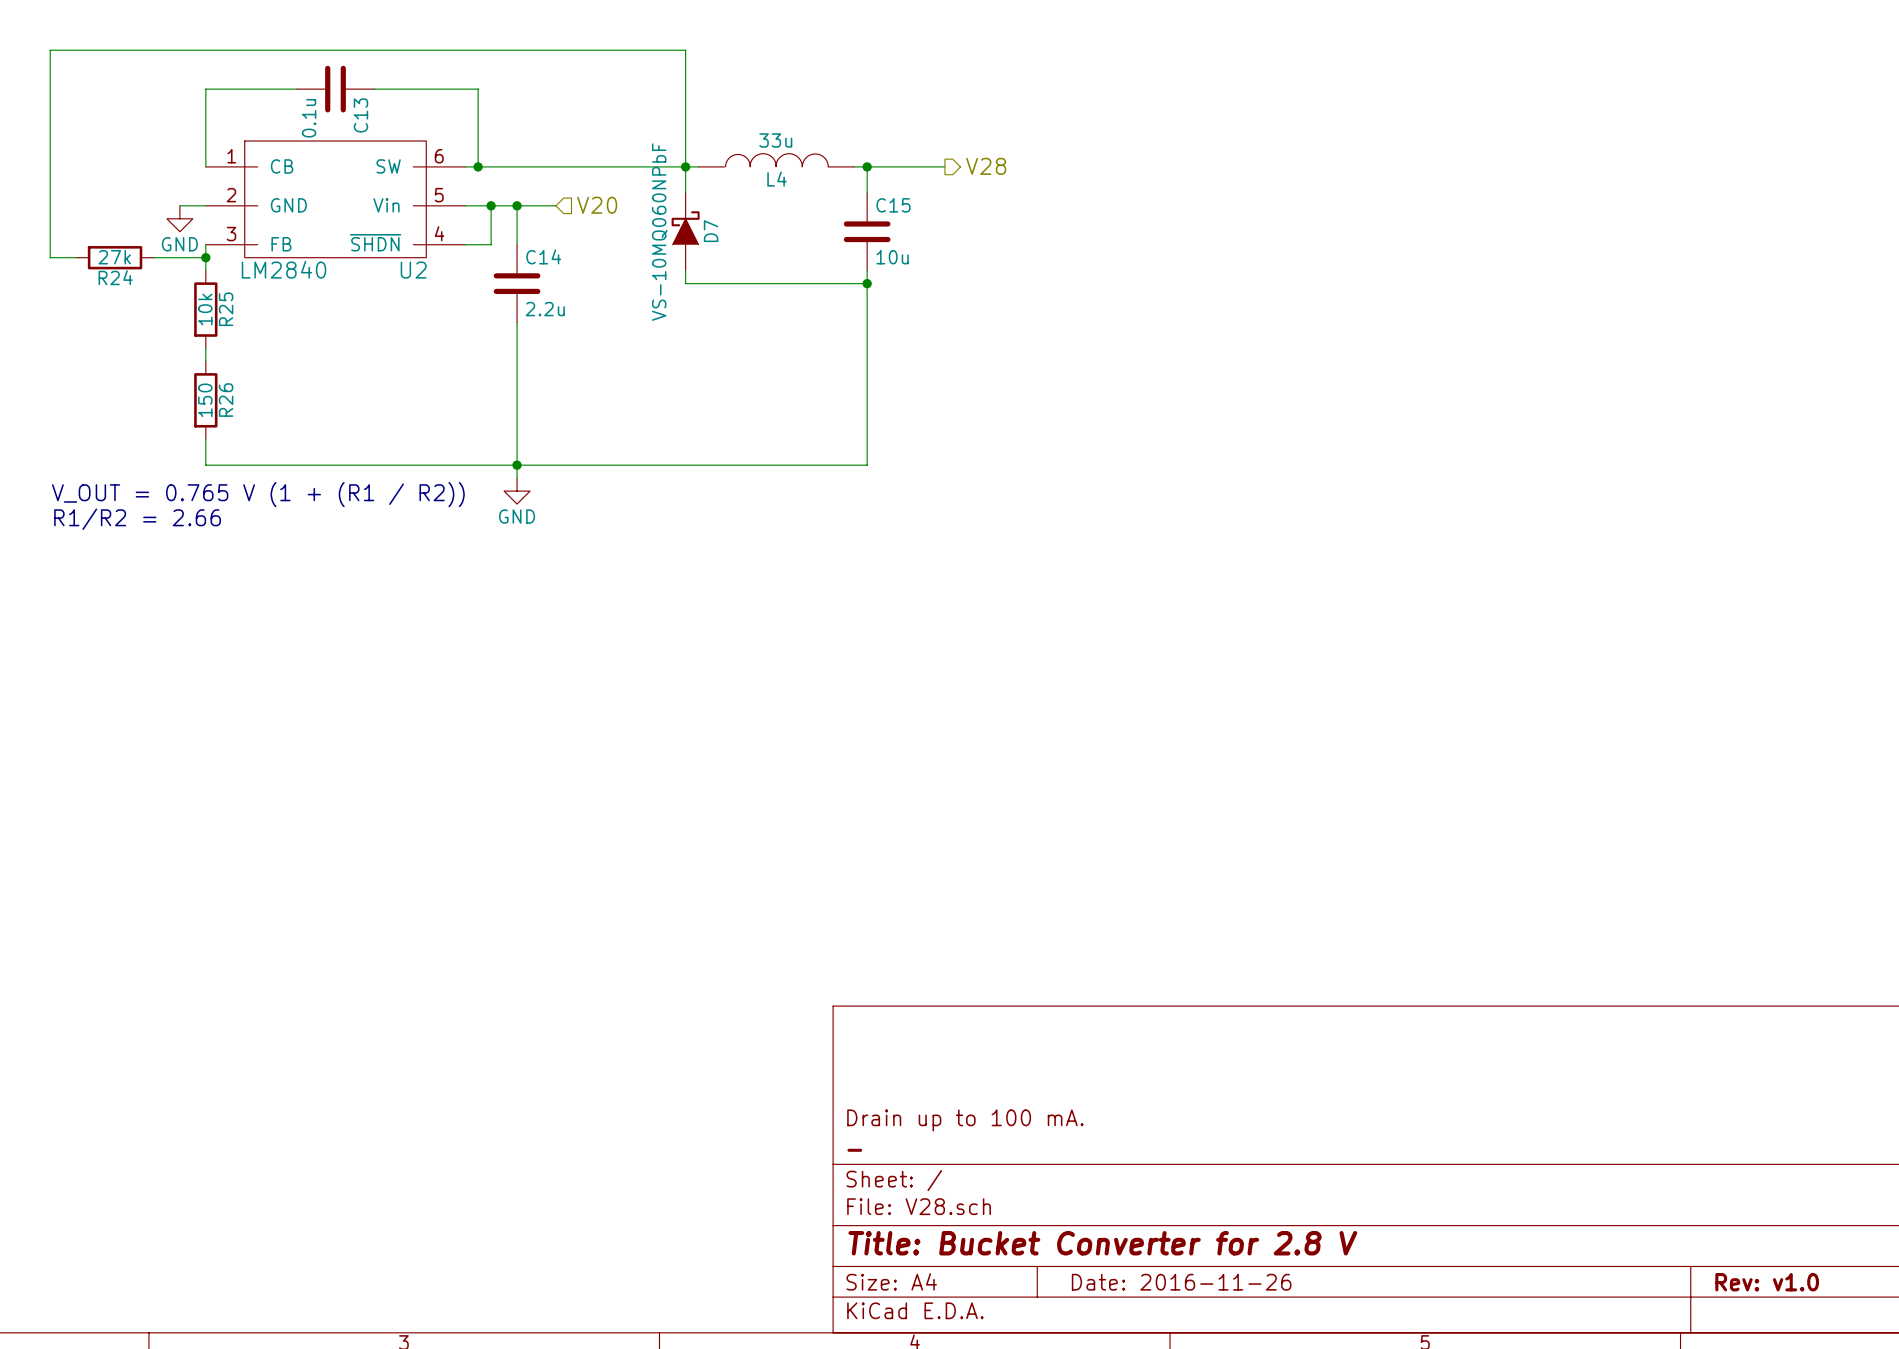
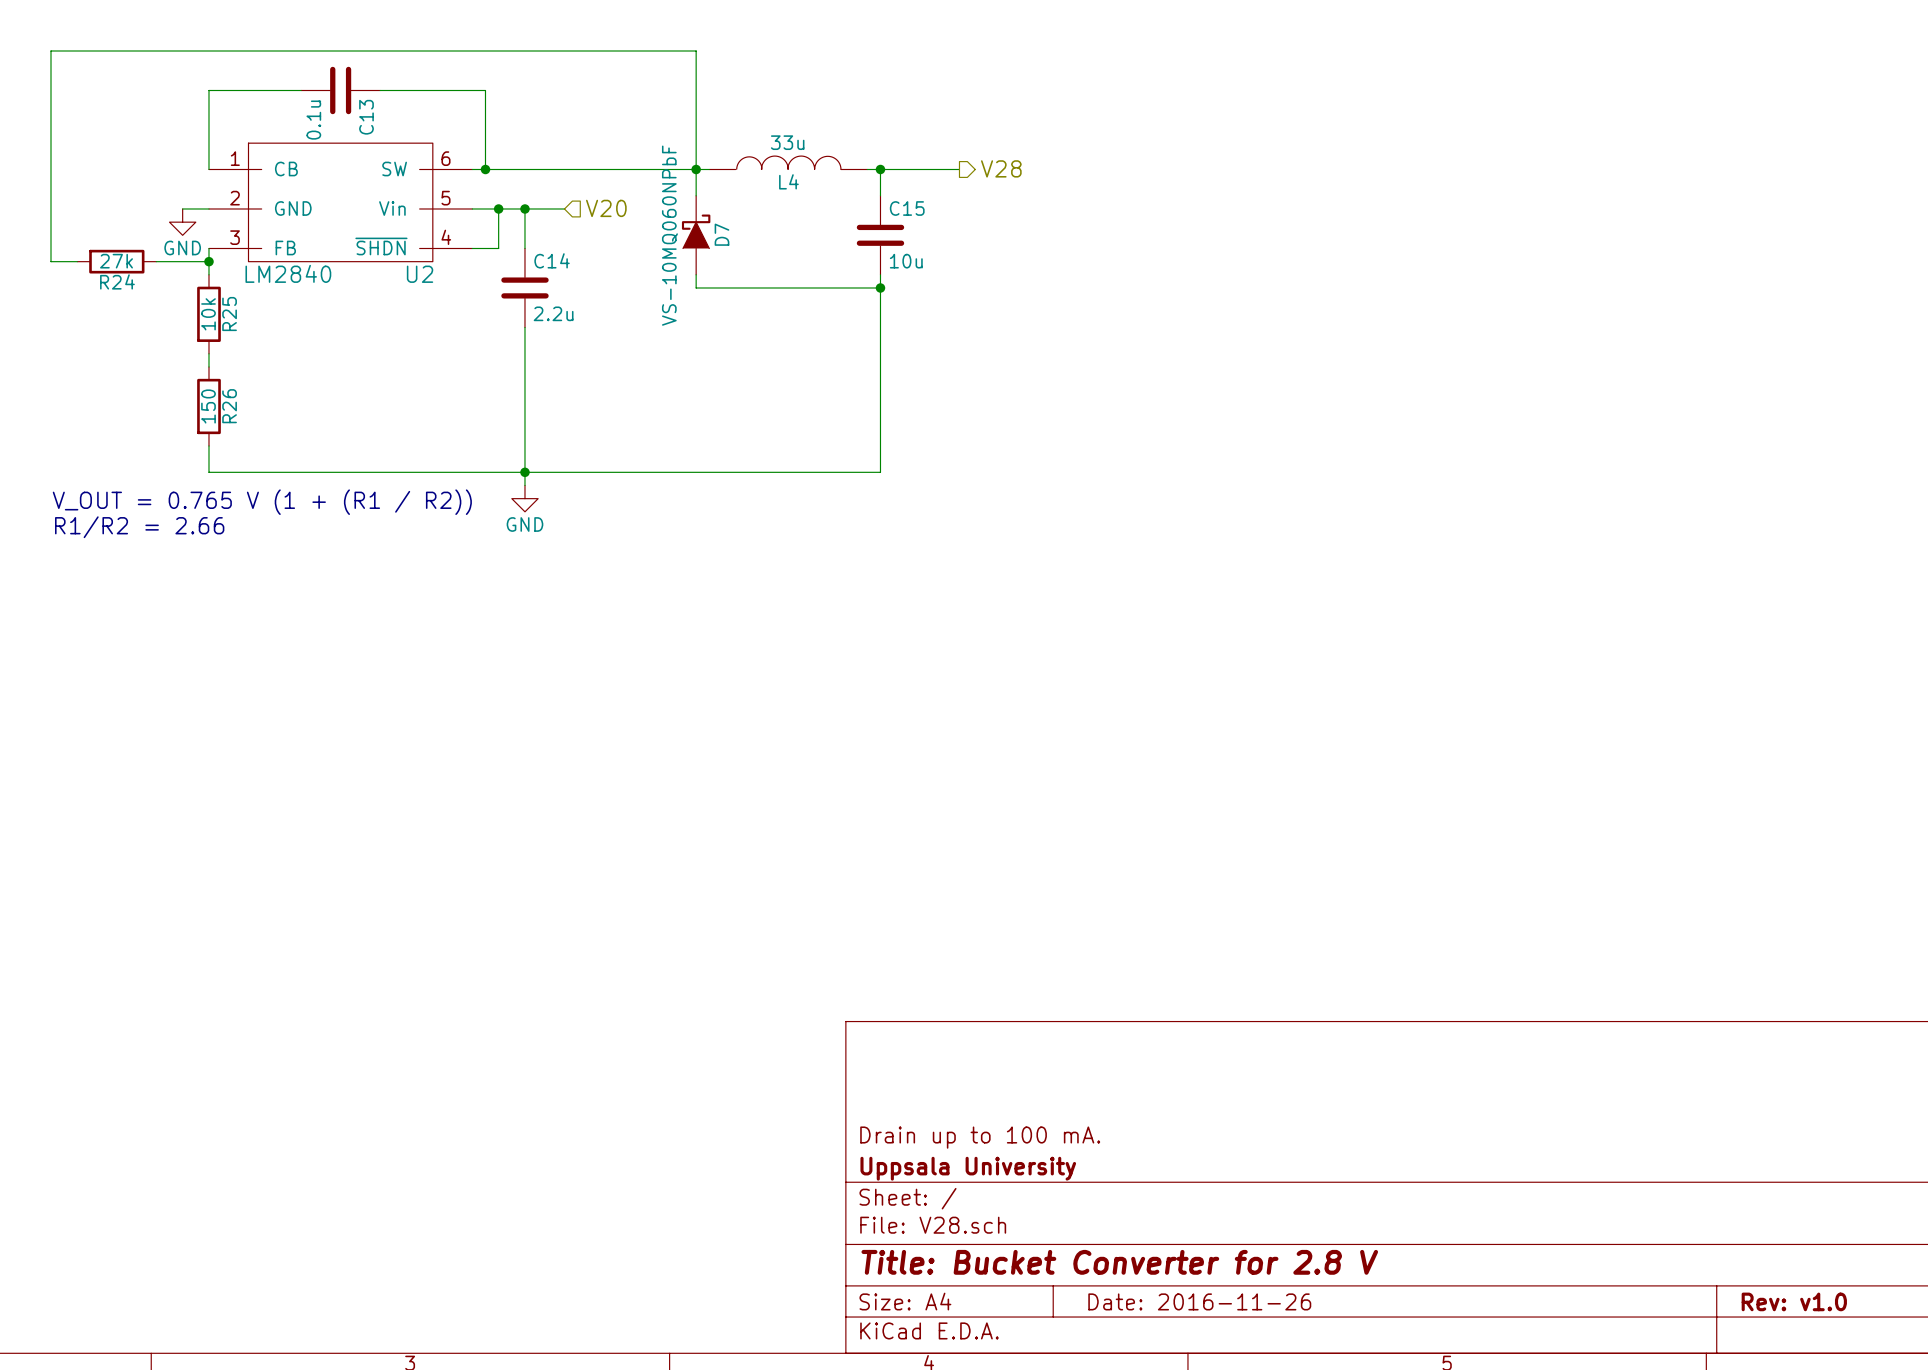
title block: - (854, 1150) -> Uppsala University (968, 1168)

